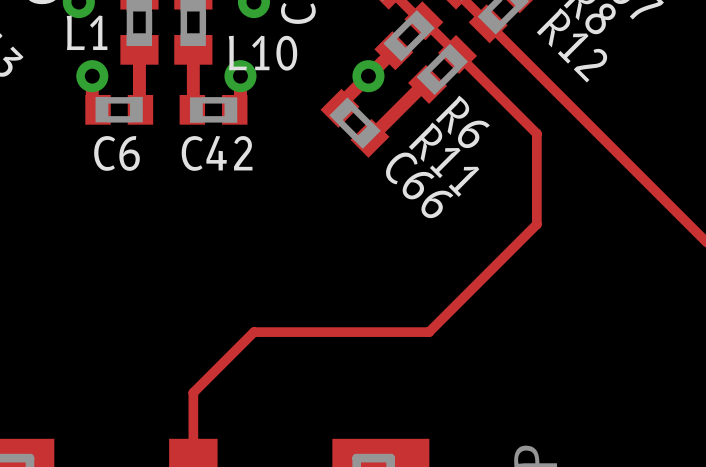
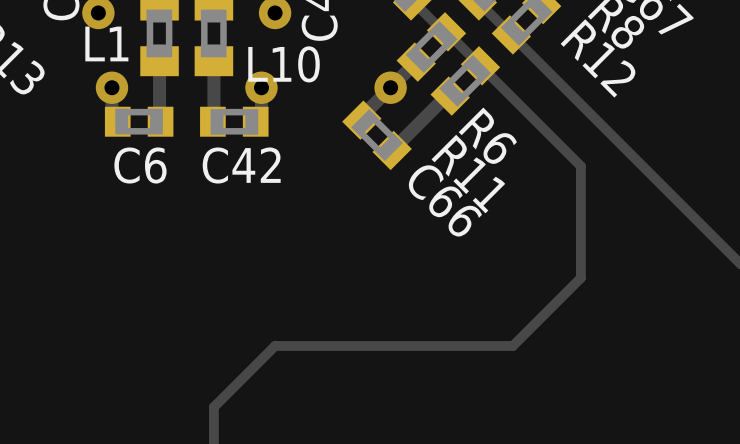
track: (536, 133) (536, 224) (429, 332) -> (560, 145) (580, 166) (580, 278) (512, 345) (451, 345)

